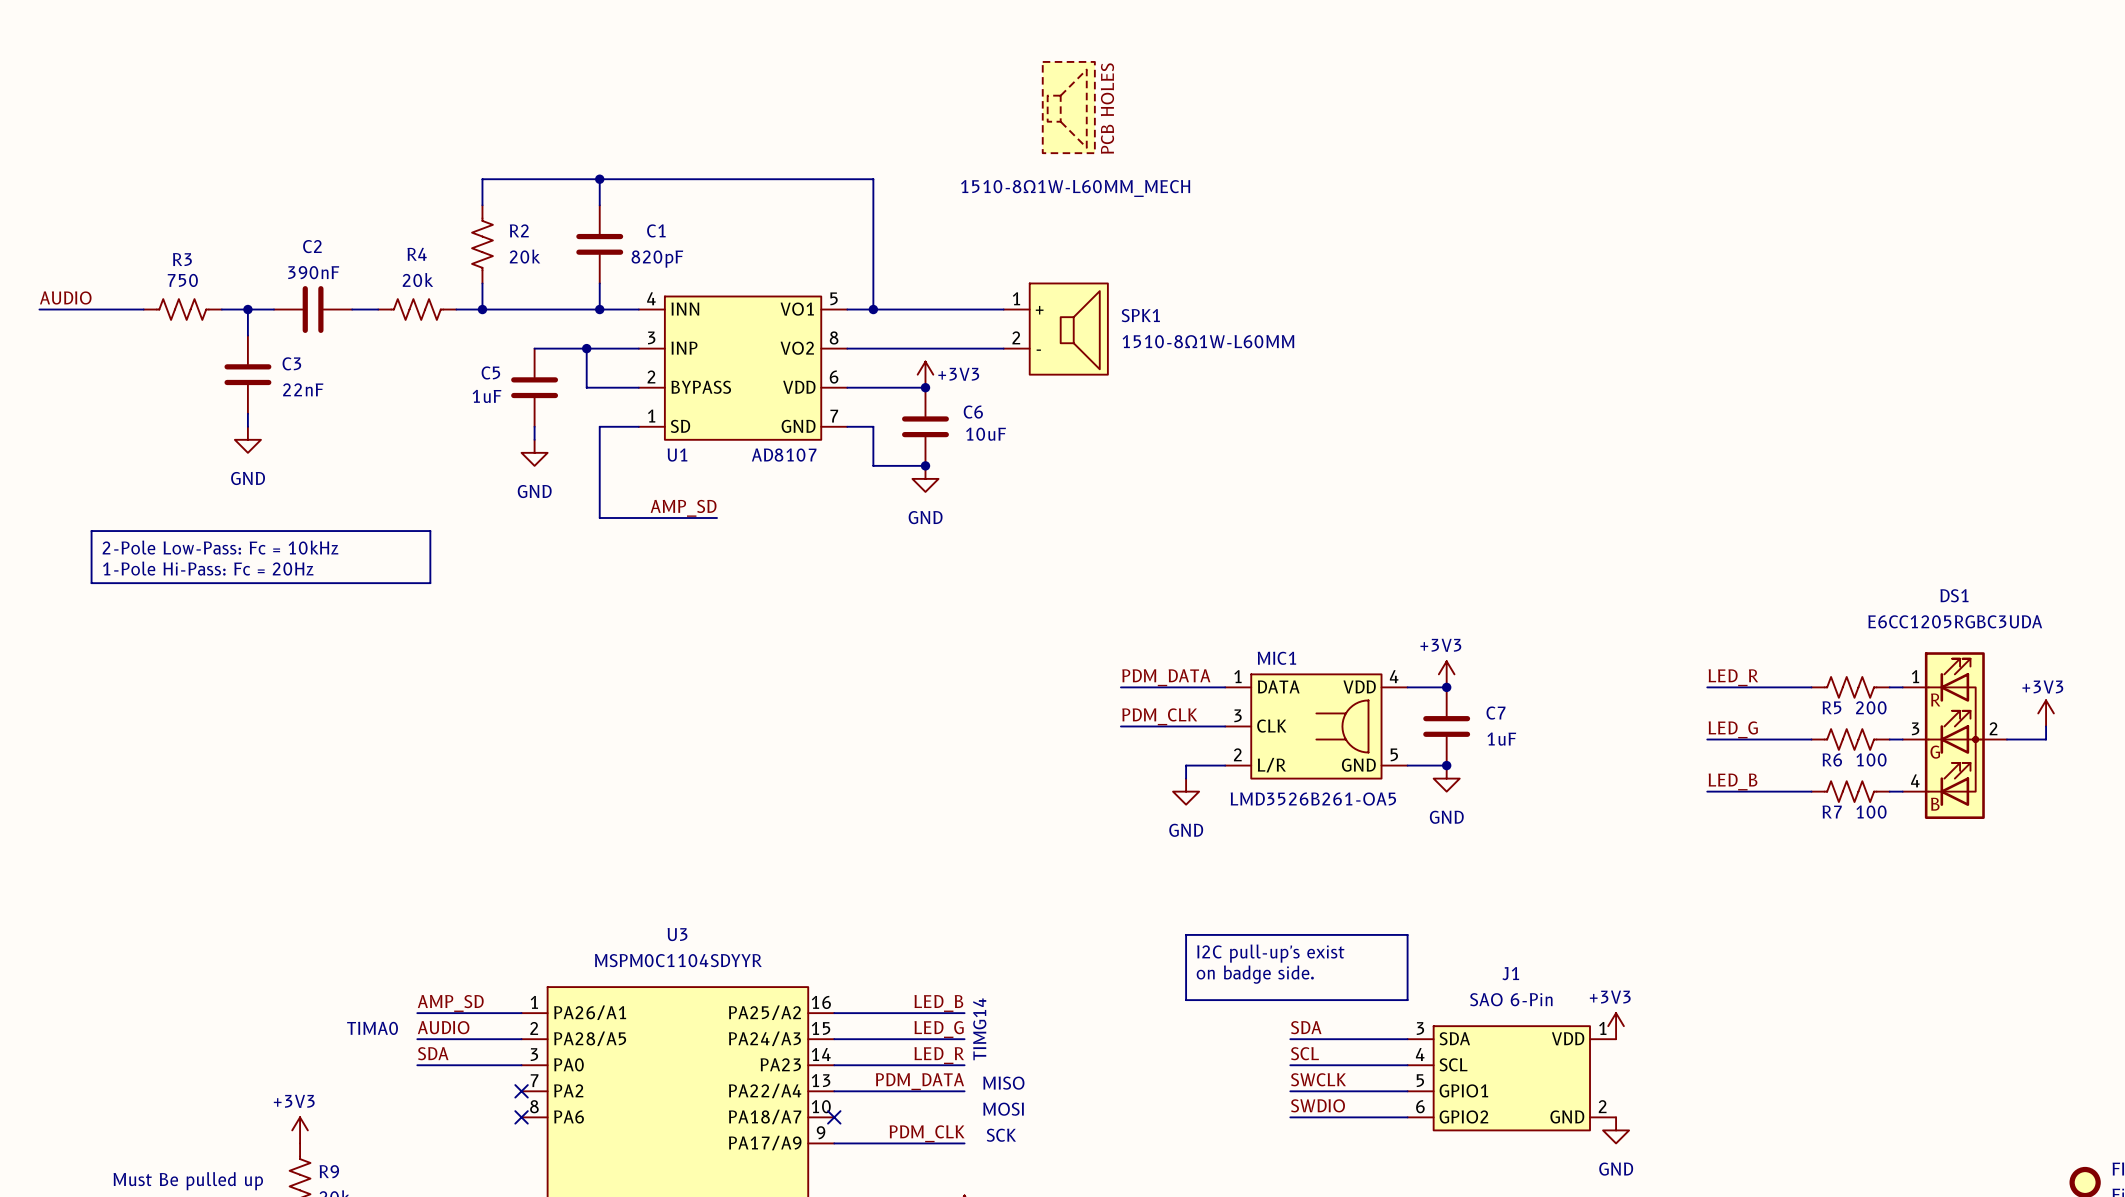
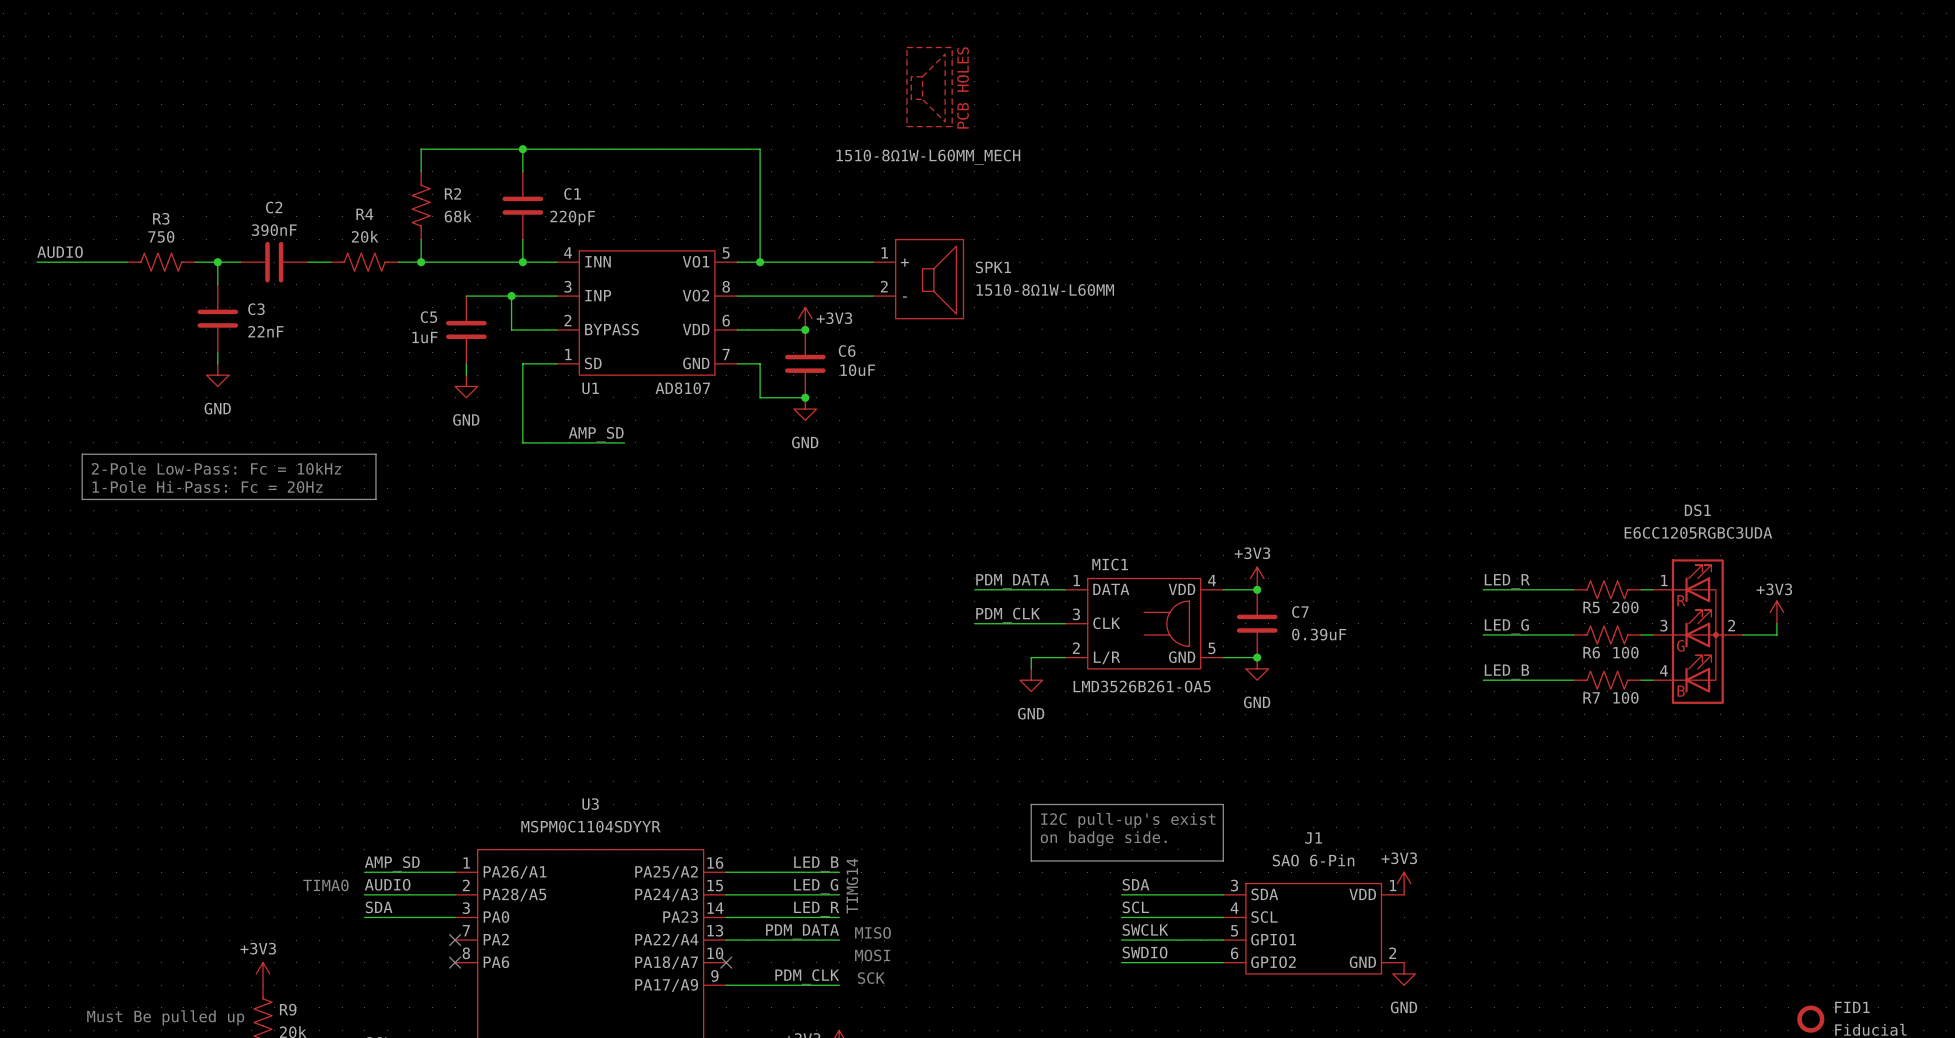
R2 value: 20k (525, 256) -> 68k (458, 216)
C1 value: 820pF (657, 259) -> 220pF (572, 218)
C7 value: 1uF (1501, 739) -> 0.39uF (1319, 634)

